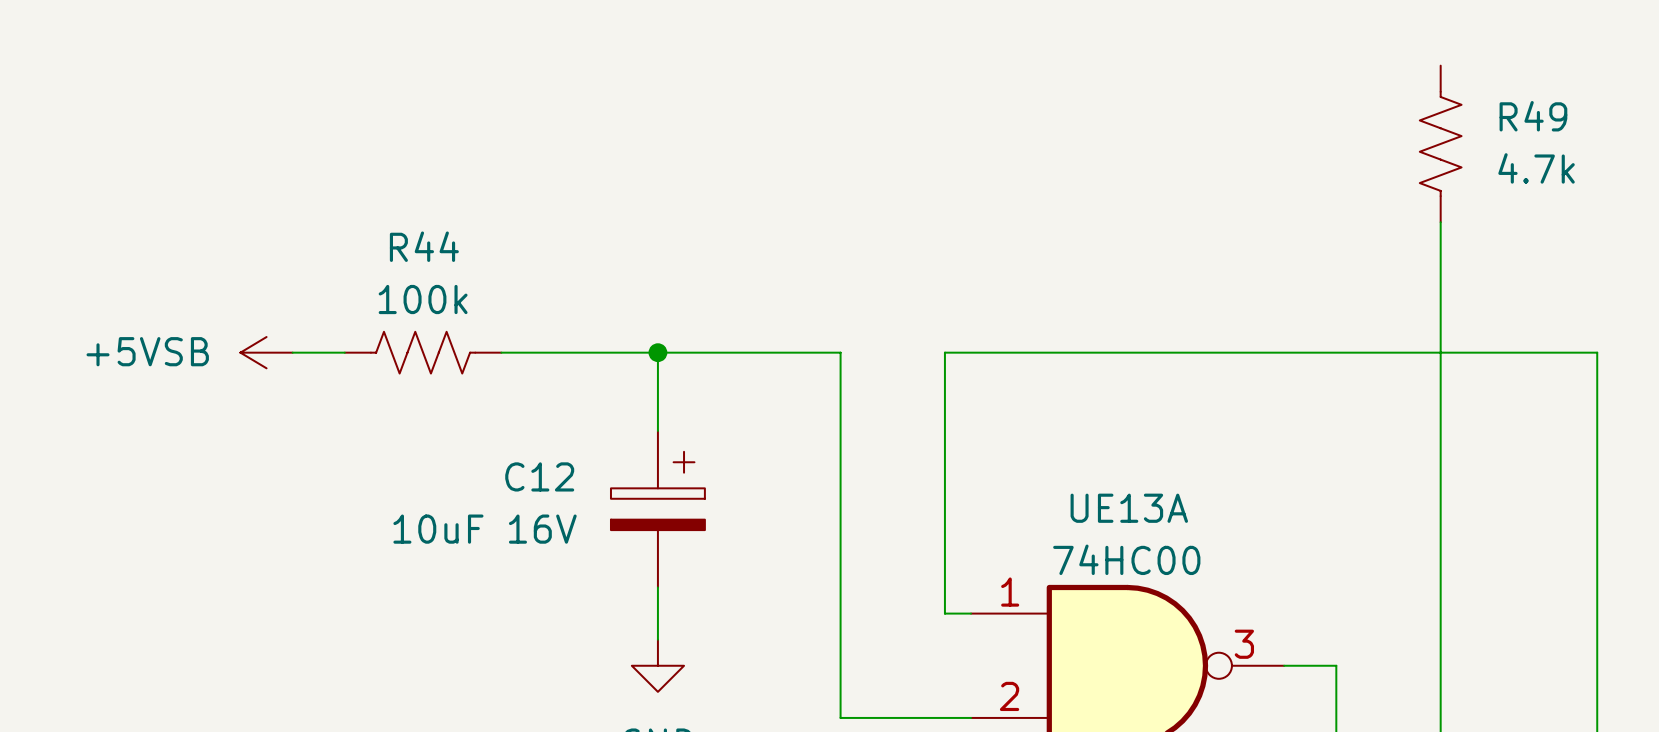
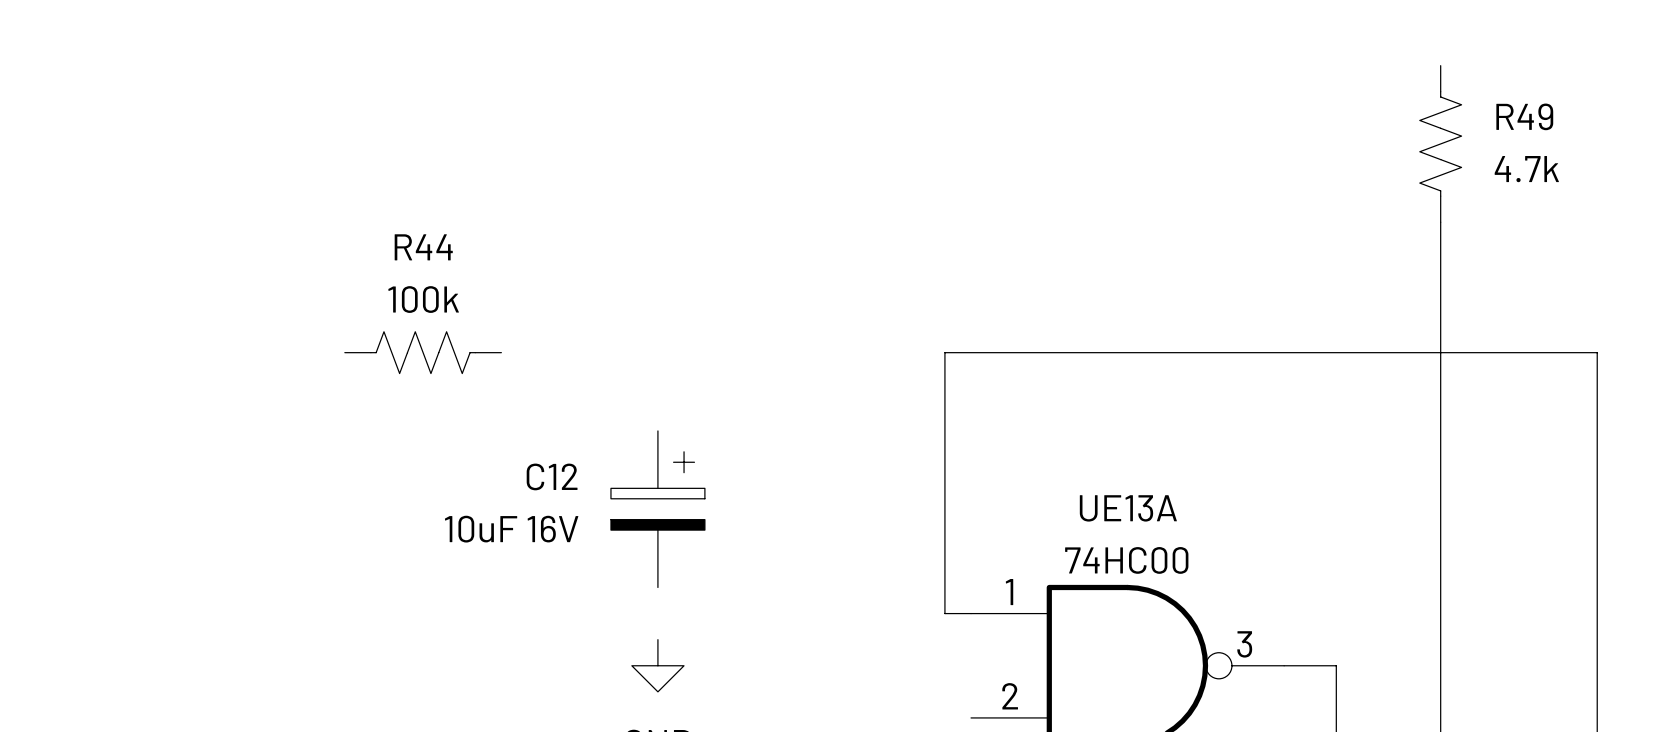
power symbol: +5VSB (266, 352) -> none
wire: (292, 352) (344, 352) -> none
wire: (501, 352) (840, 352) (840, 717) (971, 717) -> none
wire: (657, 352) (657, 430) -> none
junction: (657, 352) -> none
wire: (657, 587) (657, 639) -> none

